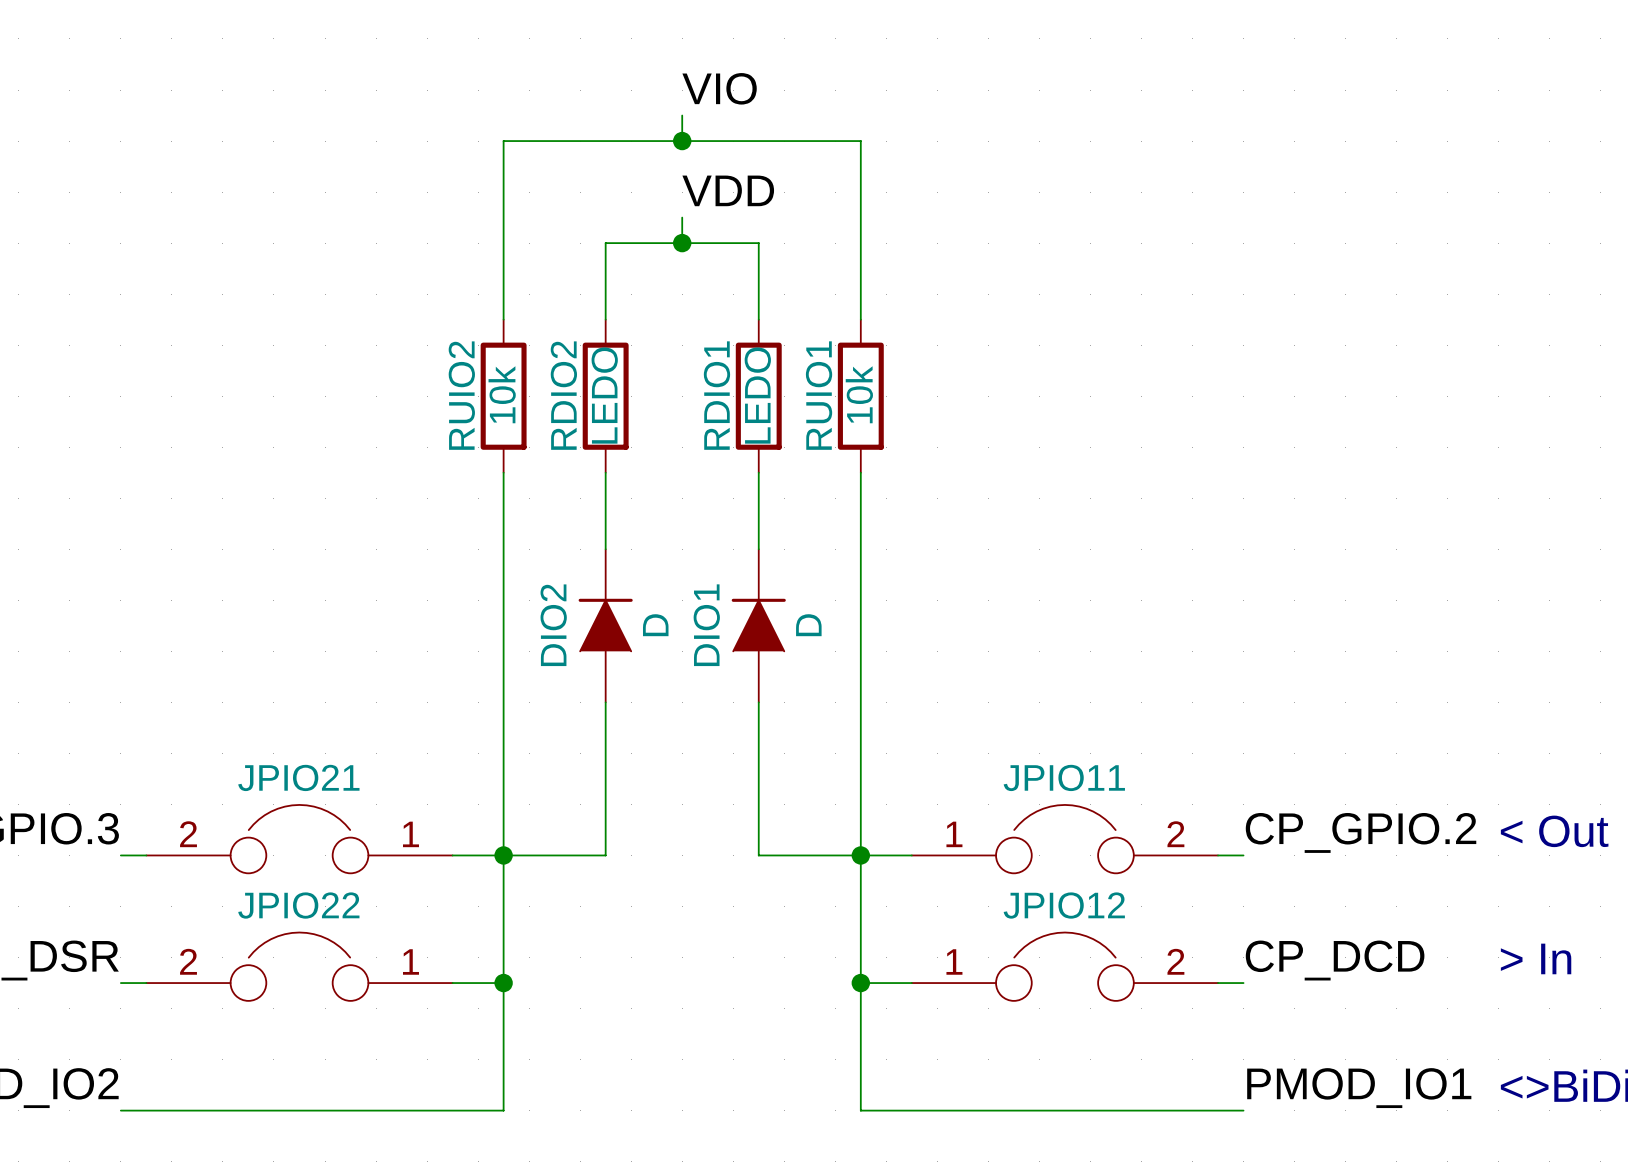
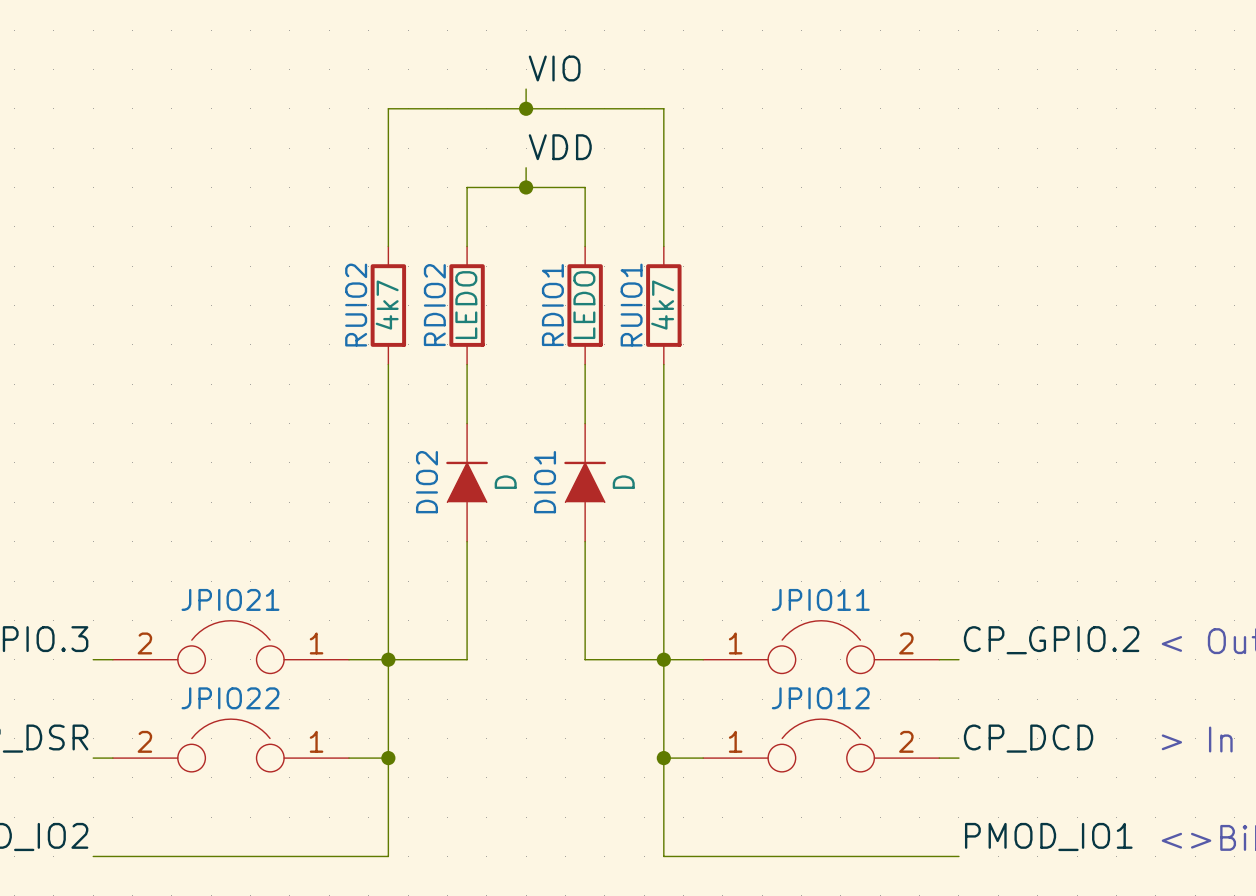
RUIO2 value: 10k (502, 394) -> 4k7 (387, 305)
RUIO1 value: 10k (859, 394) -> 4k7 (662, 305)

